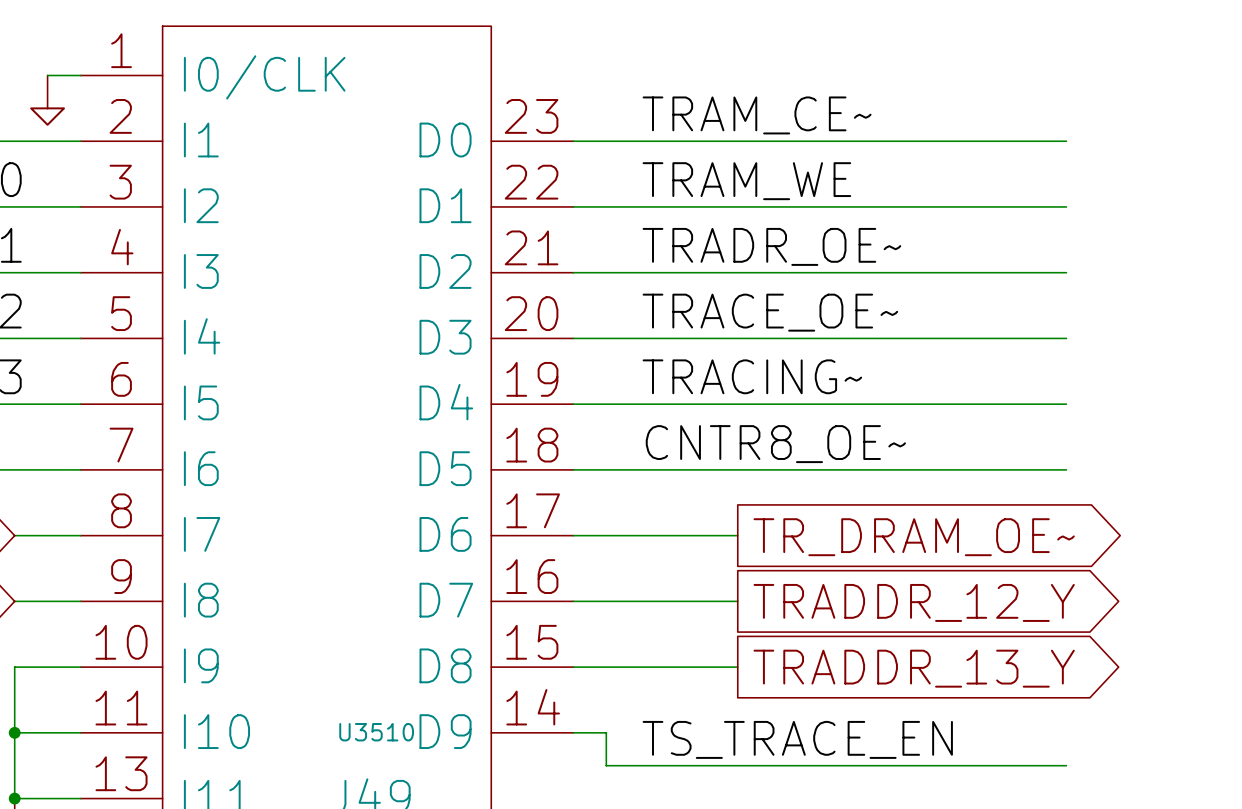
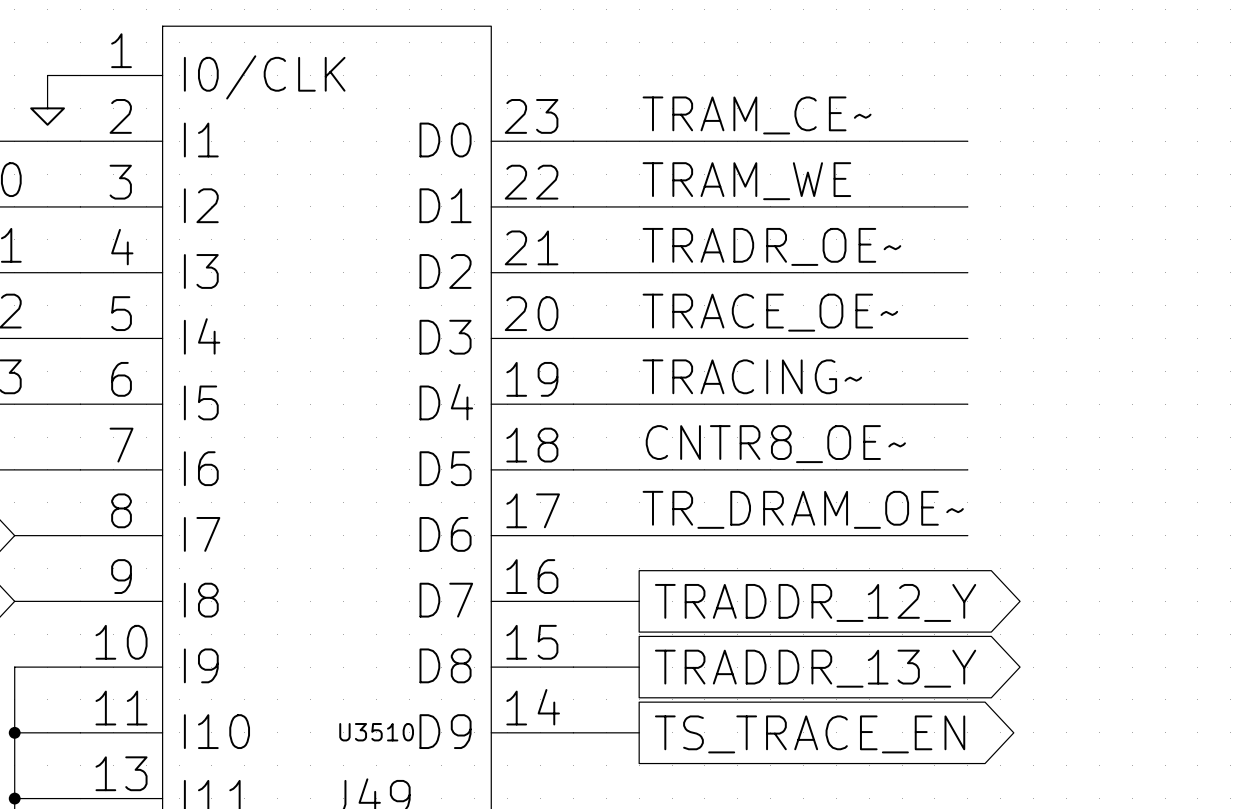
wire: (967, 141) (1066, 141) -> none
wire: (967, 206) (1066, 206) -> none
wire: (967, 272) (1066, 272) -> none
wire: (967, 338) (1066, 338) -> none
wire: (967, 404) (1066, 404) -> none
wire: (967, 469) (1066, 469) -> none
label: none -> TR_DRAM_OE~ (803, 509)
wire: none -> (737, 535) (967, 535)
global label: TR_DRAM_OE~ (914, 537) -> none
wire: (639, 601) (737, 601) -> none
global label position: TRADDR_12_Y (914, 602) -> TRADDR_12_Y (815, 602)
wire: (639, 667) (737, 667) -> none
global label position: TRADDR_13_Y (914, 668) -> TRADDR_13_Y (815, 668)
wire: (606, 732) (606, 765) (1066, 765) -> (606, 732) (639, 732)
global label: none -> TS_TRACE_EN (810, 734)
label: TS_TRACE_EN (797, 739) -> none

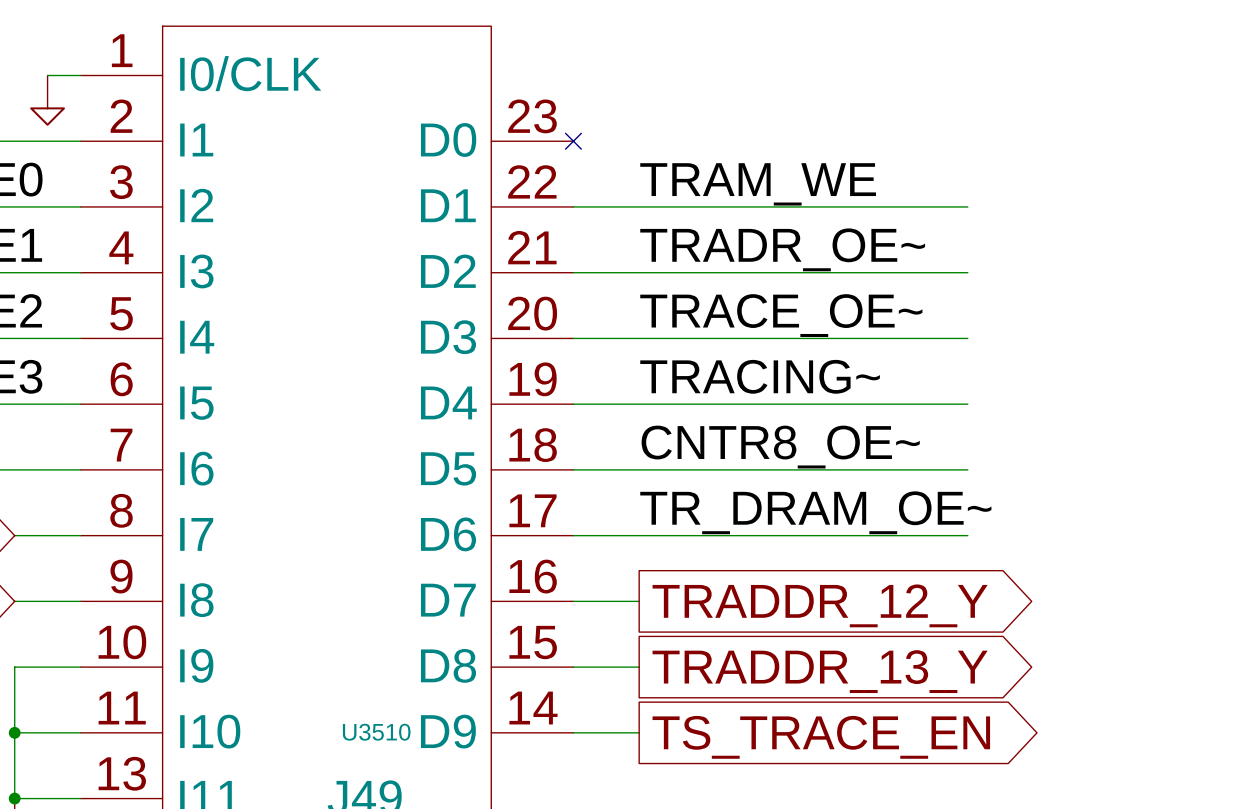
label: TRAM_CE~ (757, 115) -> none
wire: (573, 141) (967, 141) -> none
no-connect mark: none -> (573, 141)

